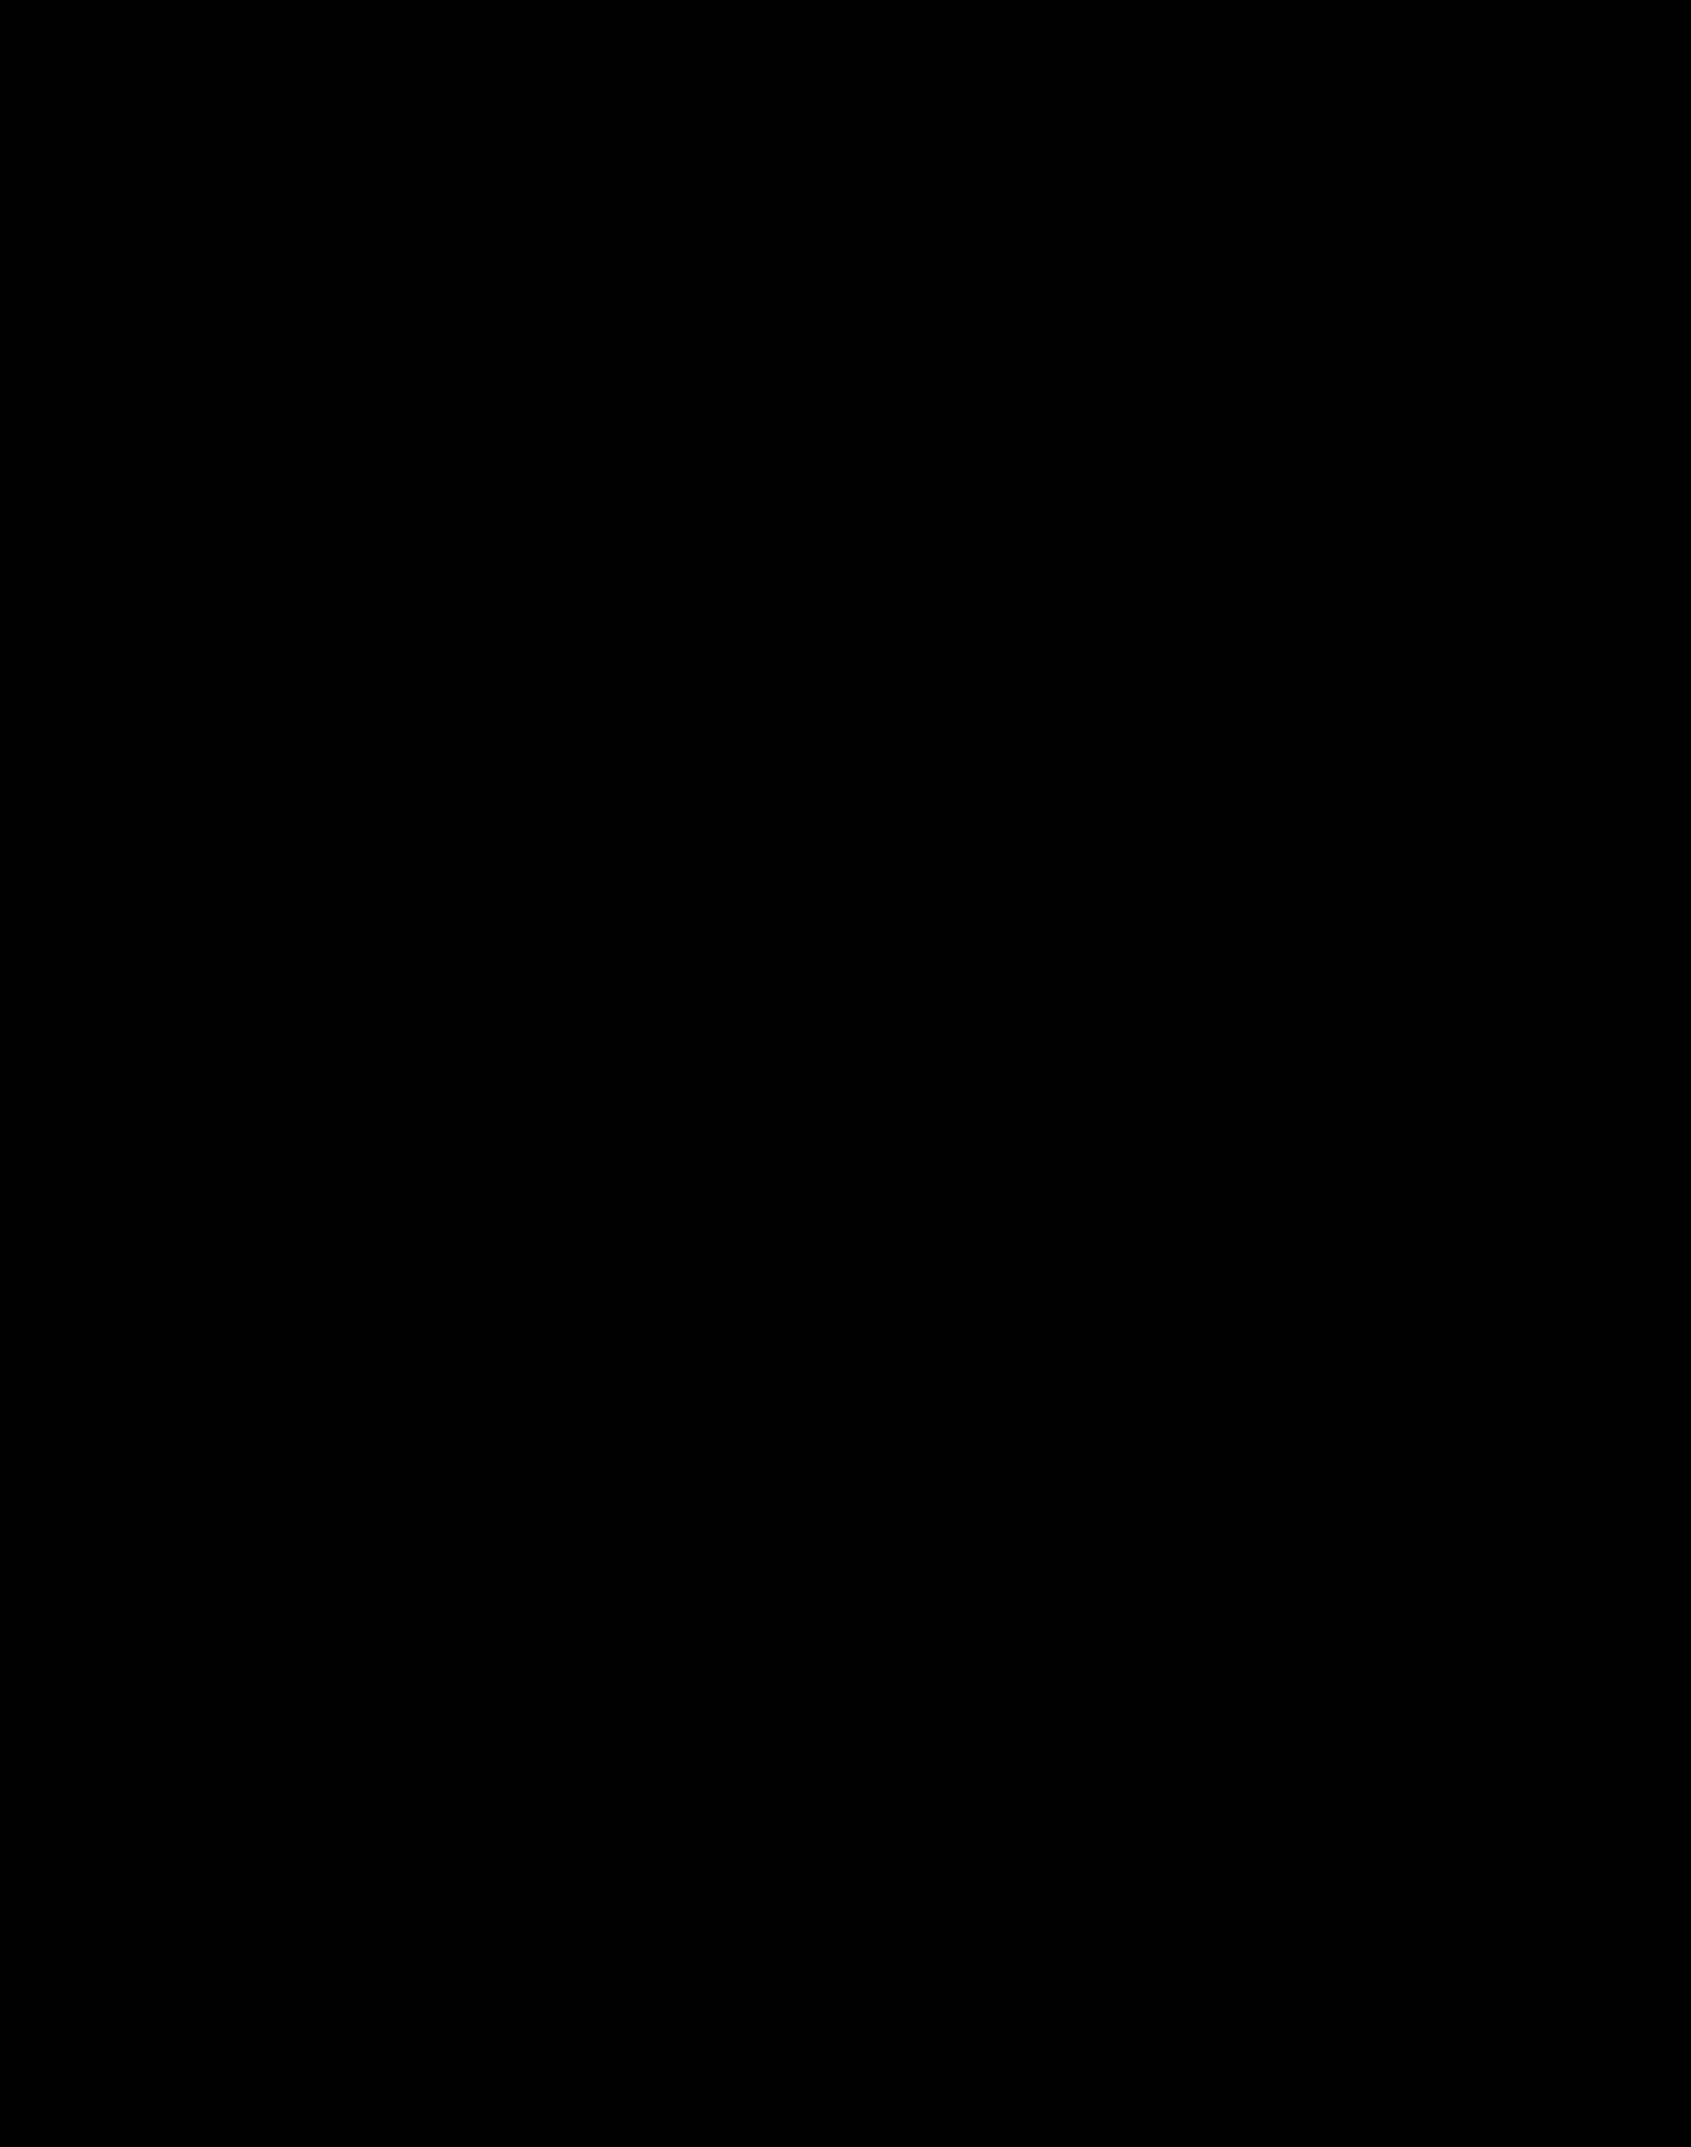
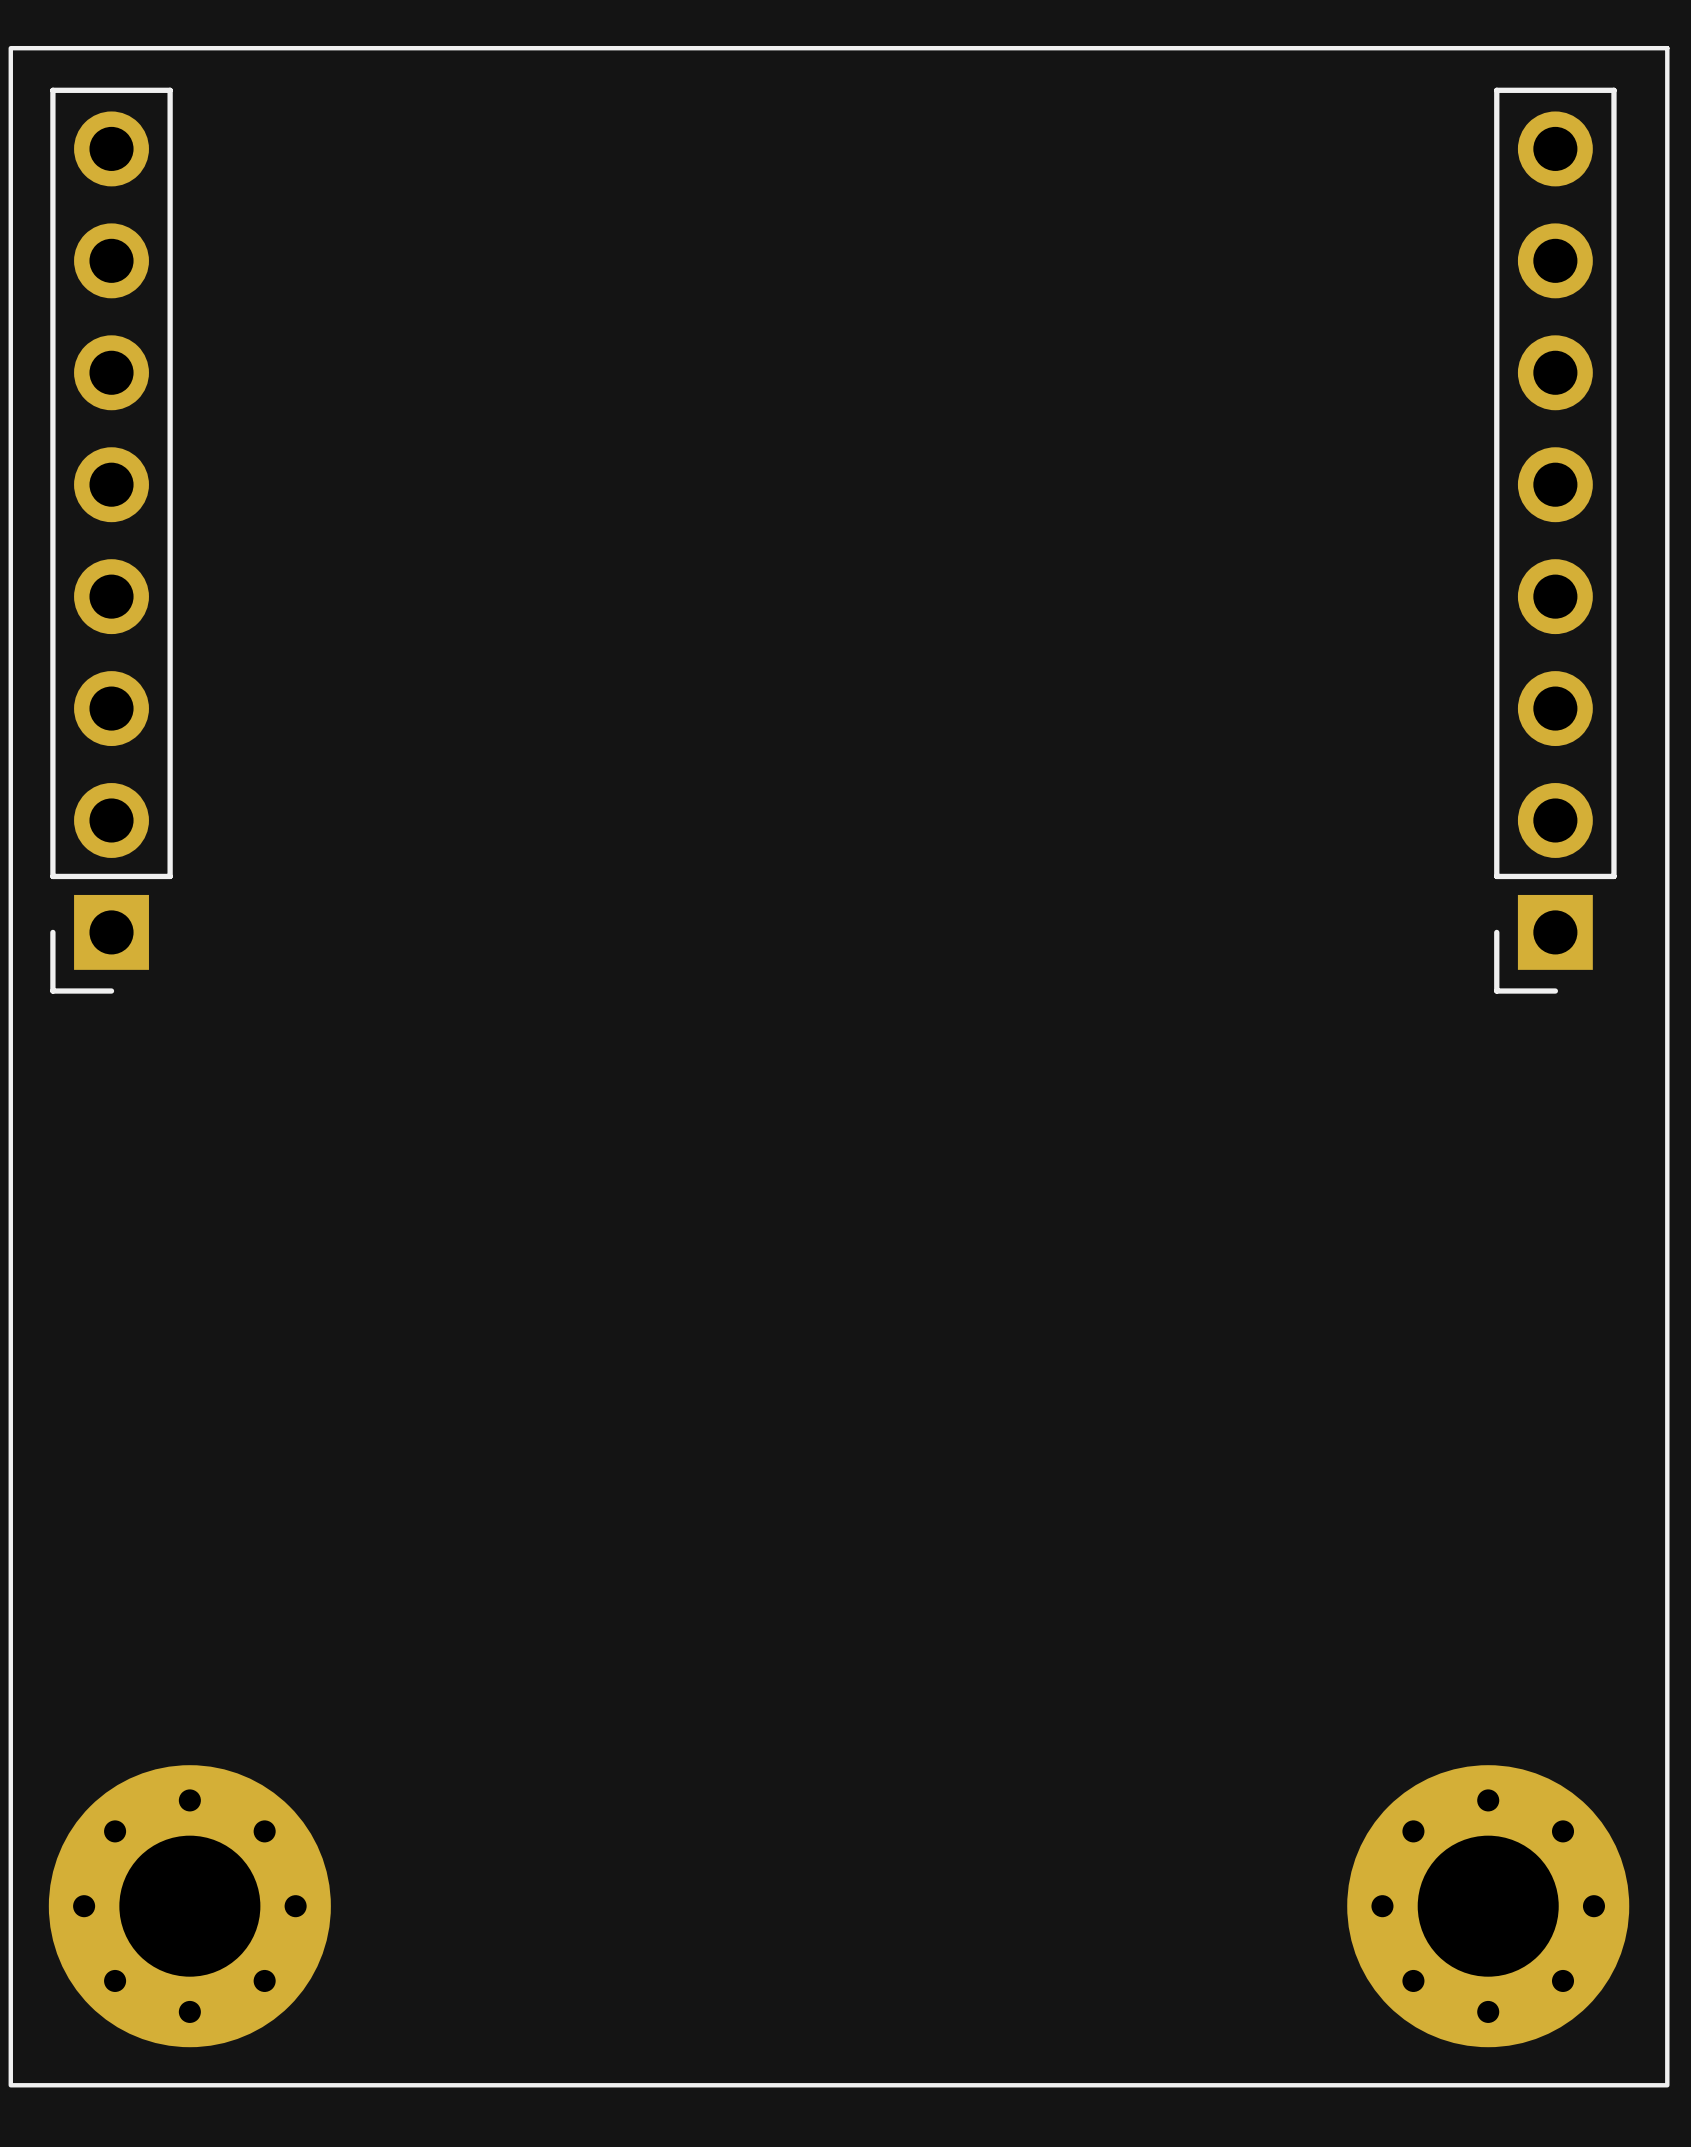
part: none -> (839, 1066)

